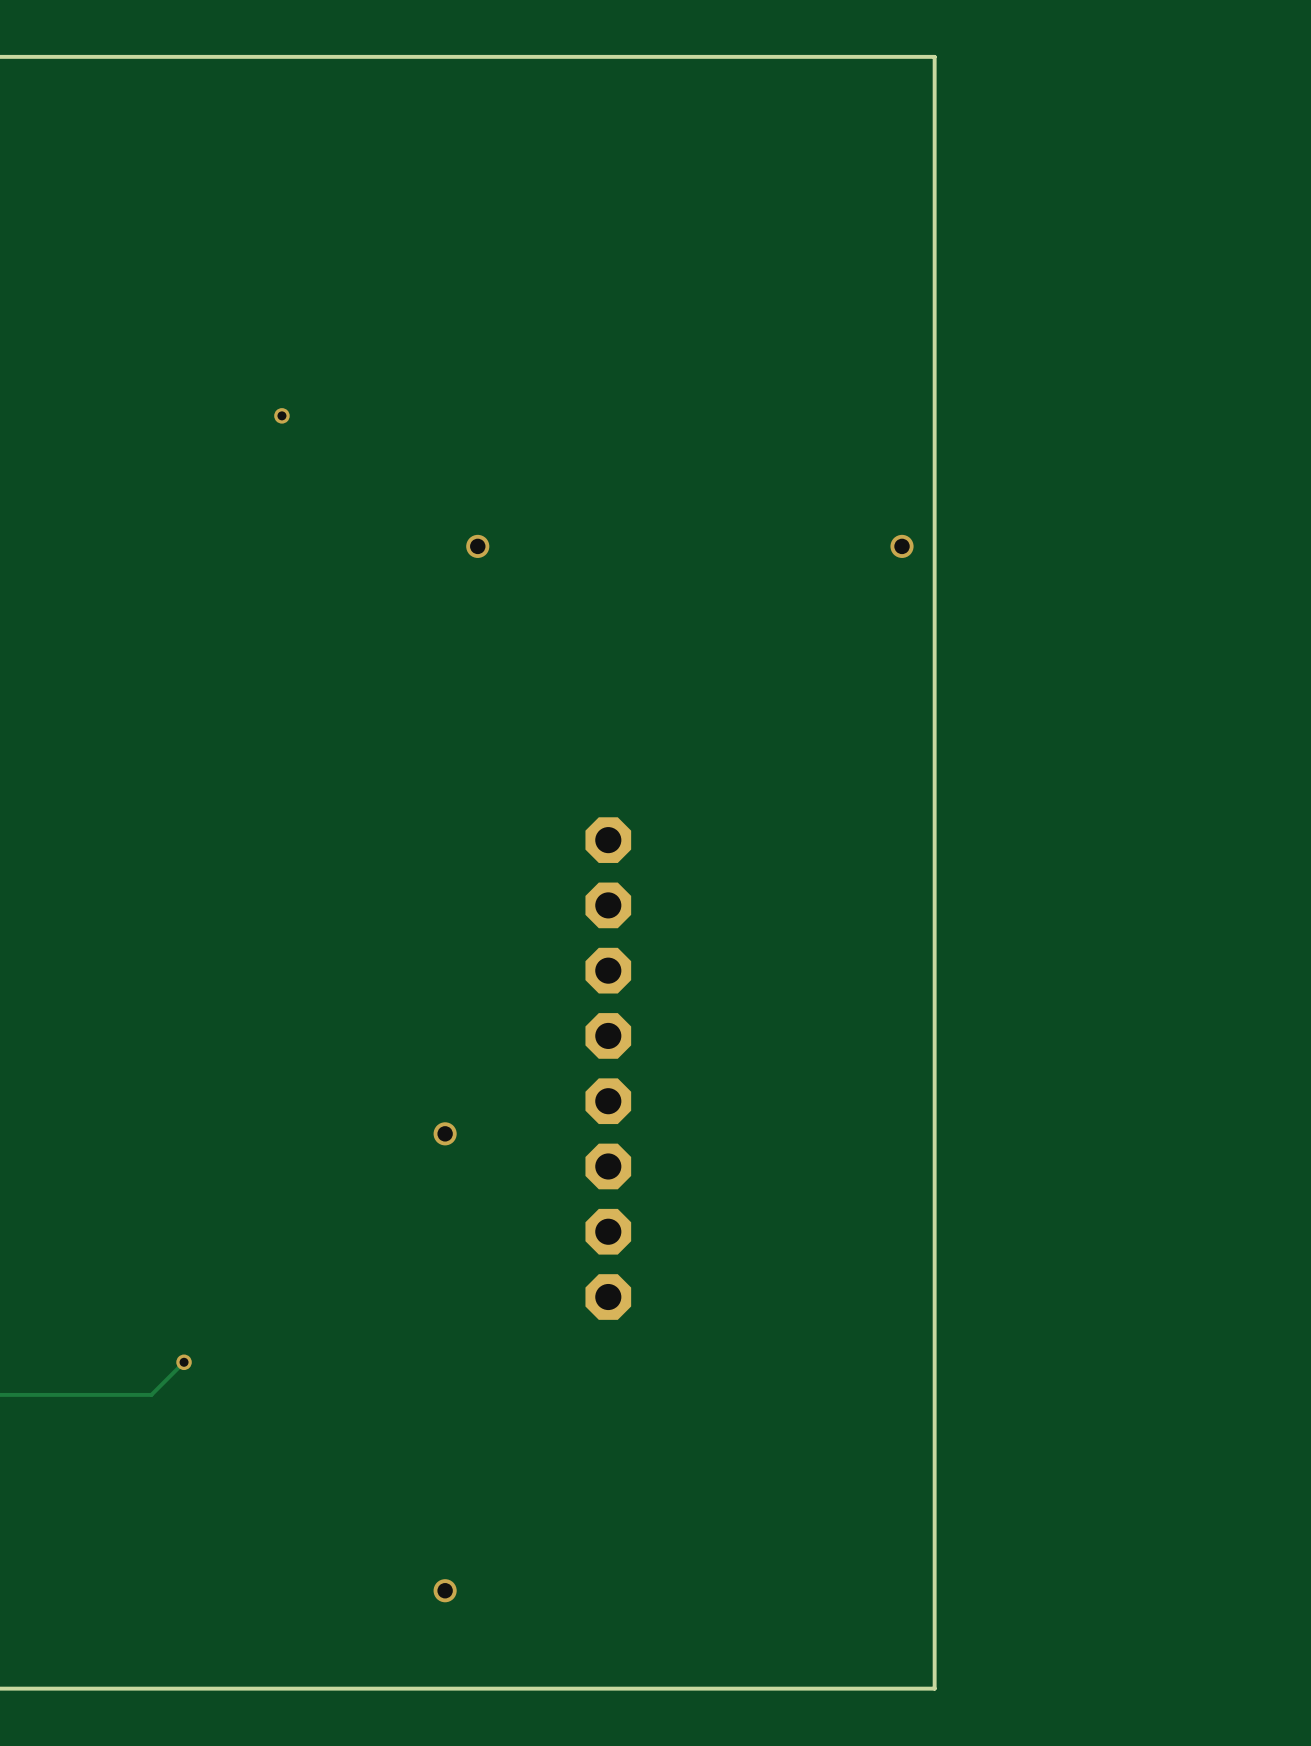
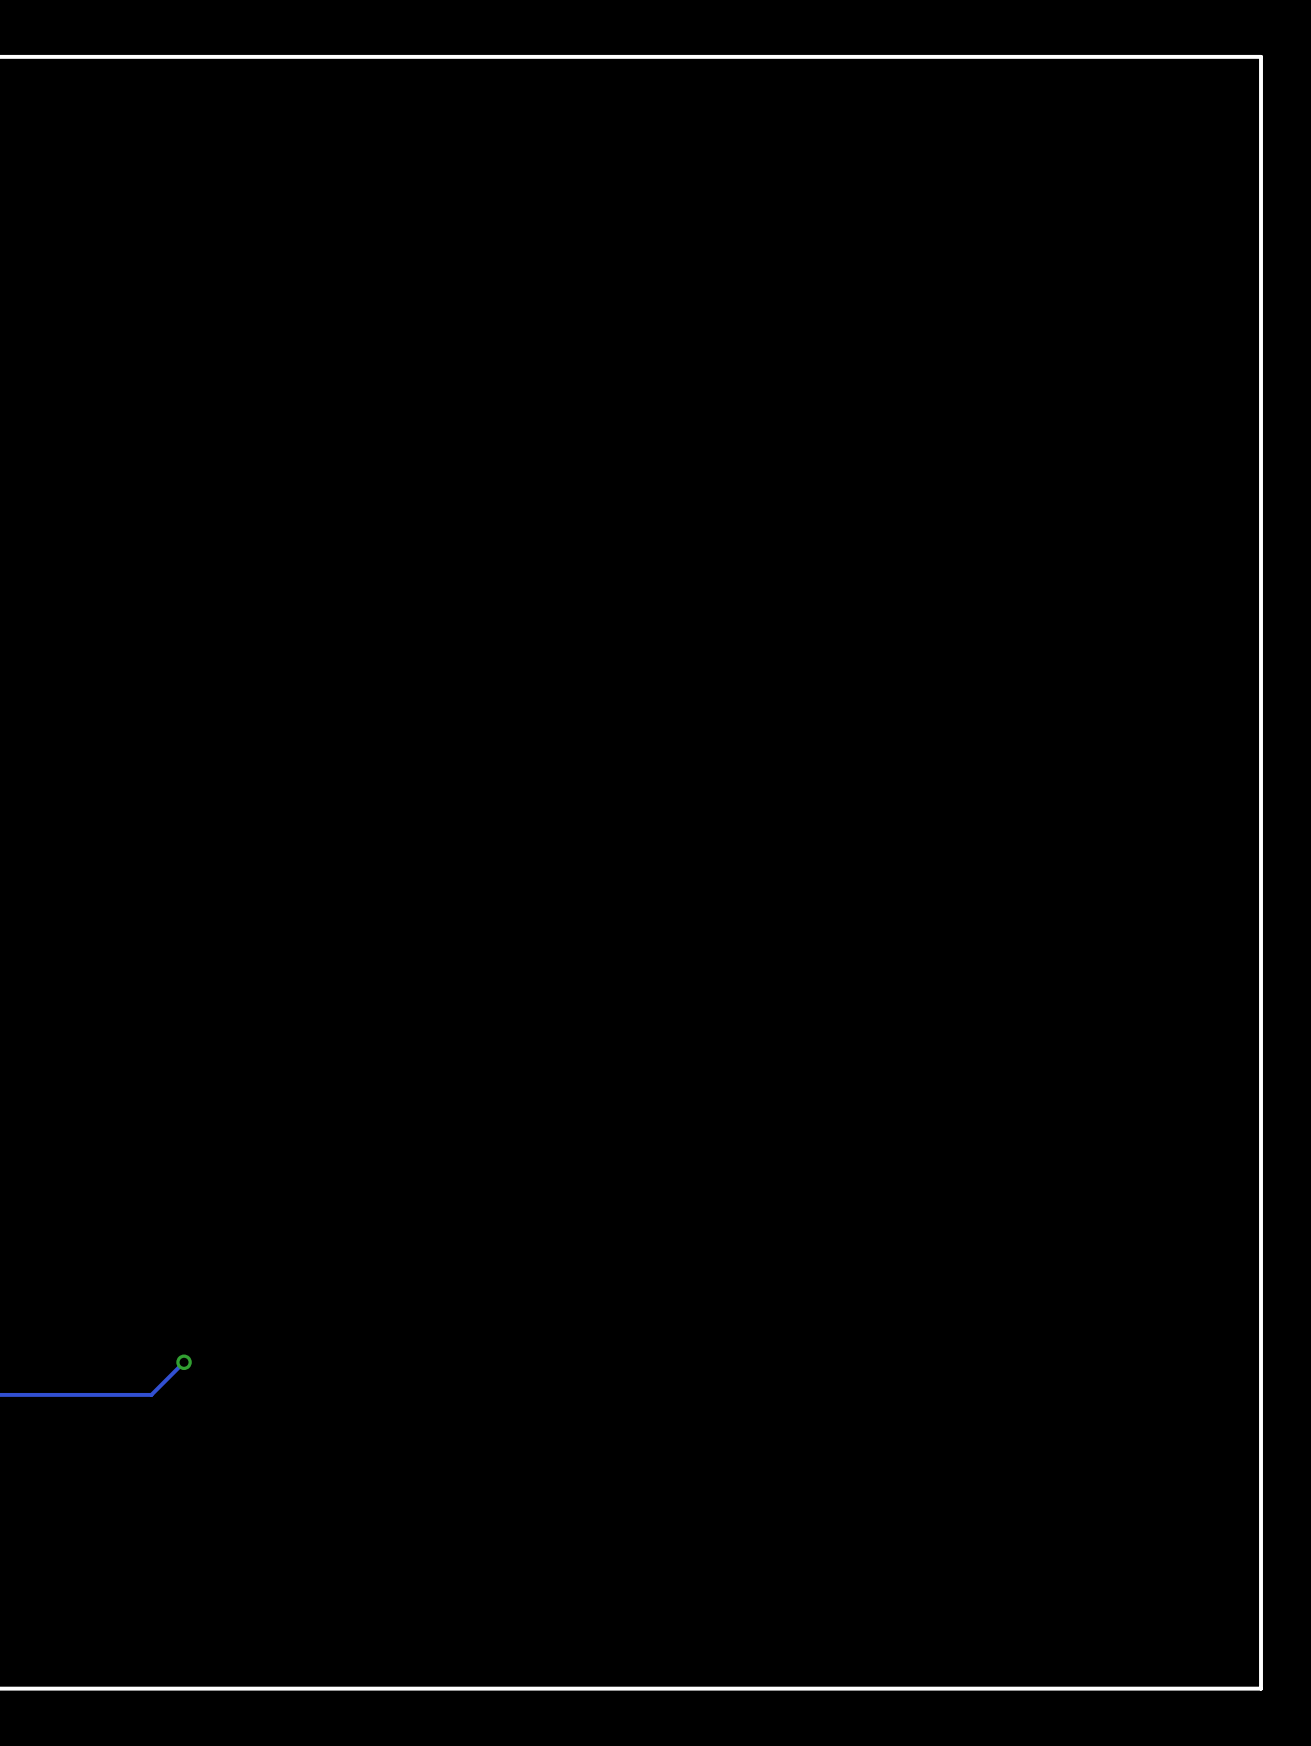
board edge: (934, 56) (934, 1688) -> (934, 56) (1261, 56) (1261, 1688) (934, 1688)
via: (281, 415) -> none
via: (477, 546) -> none
via: (902, 546) -> none
part: (608, 1068) -> none
via: (445, 1133) -> none
via: (445, 1590) -> none

